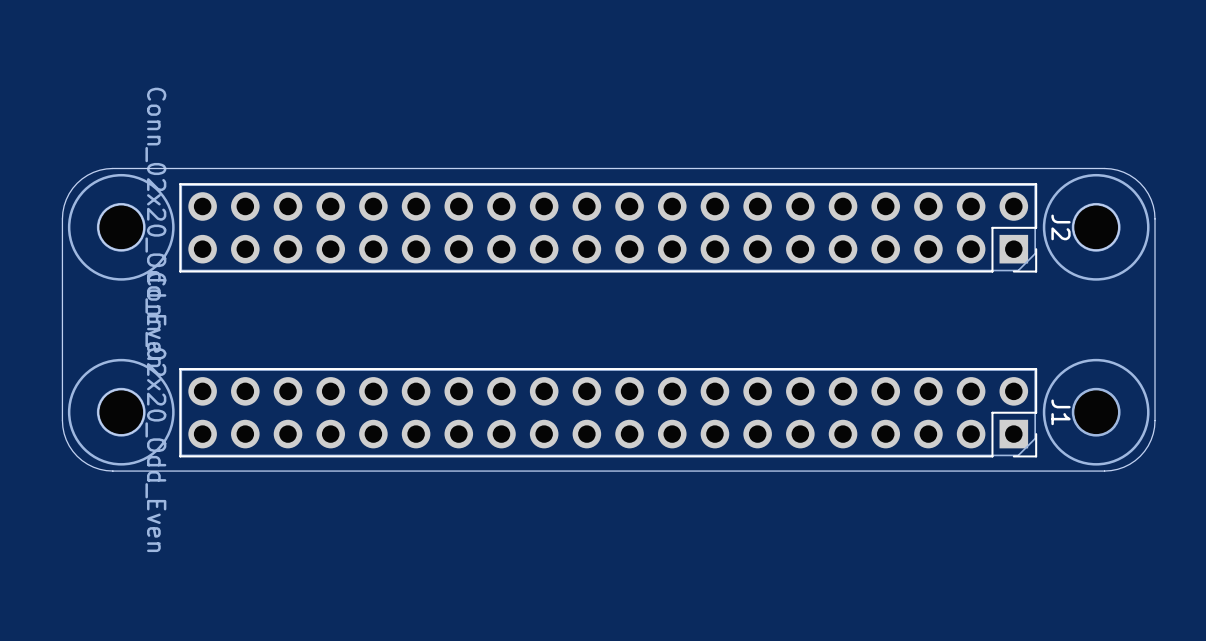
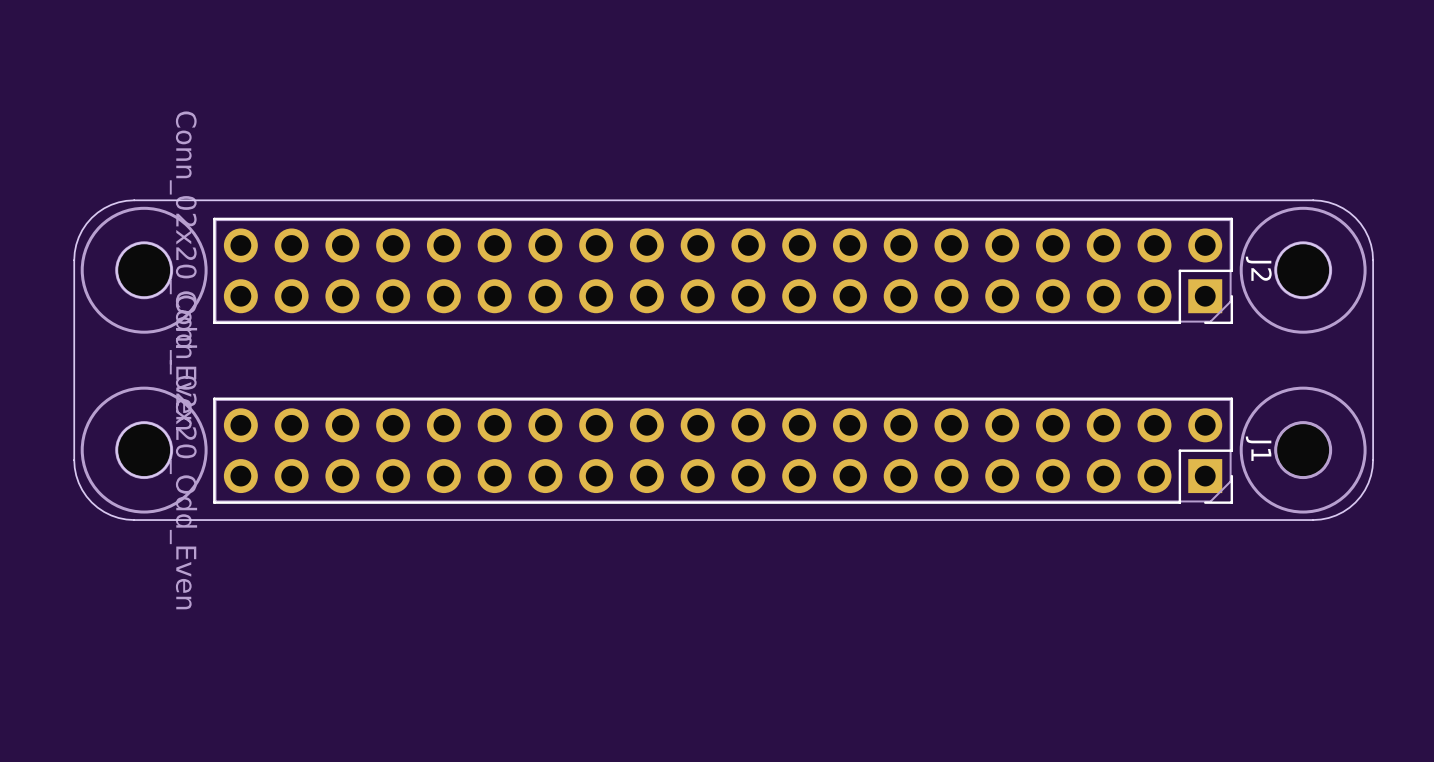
board edge: (1155, 387) (1154, 427) (1148, 445) (1140, 456) (1129, 464) (1117, 469) (1104, 471) (106, 470) (87, 464) (77, 456) (69, 445) (62, 427) (62, 387) -> (1373, 460) (1368, 483) (1355, 502) (1336, 515) (1313, 520) (134, 520) (111, 515) (91, 502) (78, 483) (74, 460)
part position: (121, 412) -> (144, 450)
J1 position: (608, 412) -> (723, 450)
part position: (1096, 412) -> (1303, 450)

